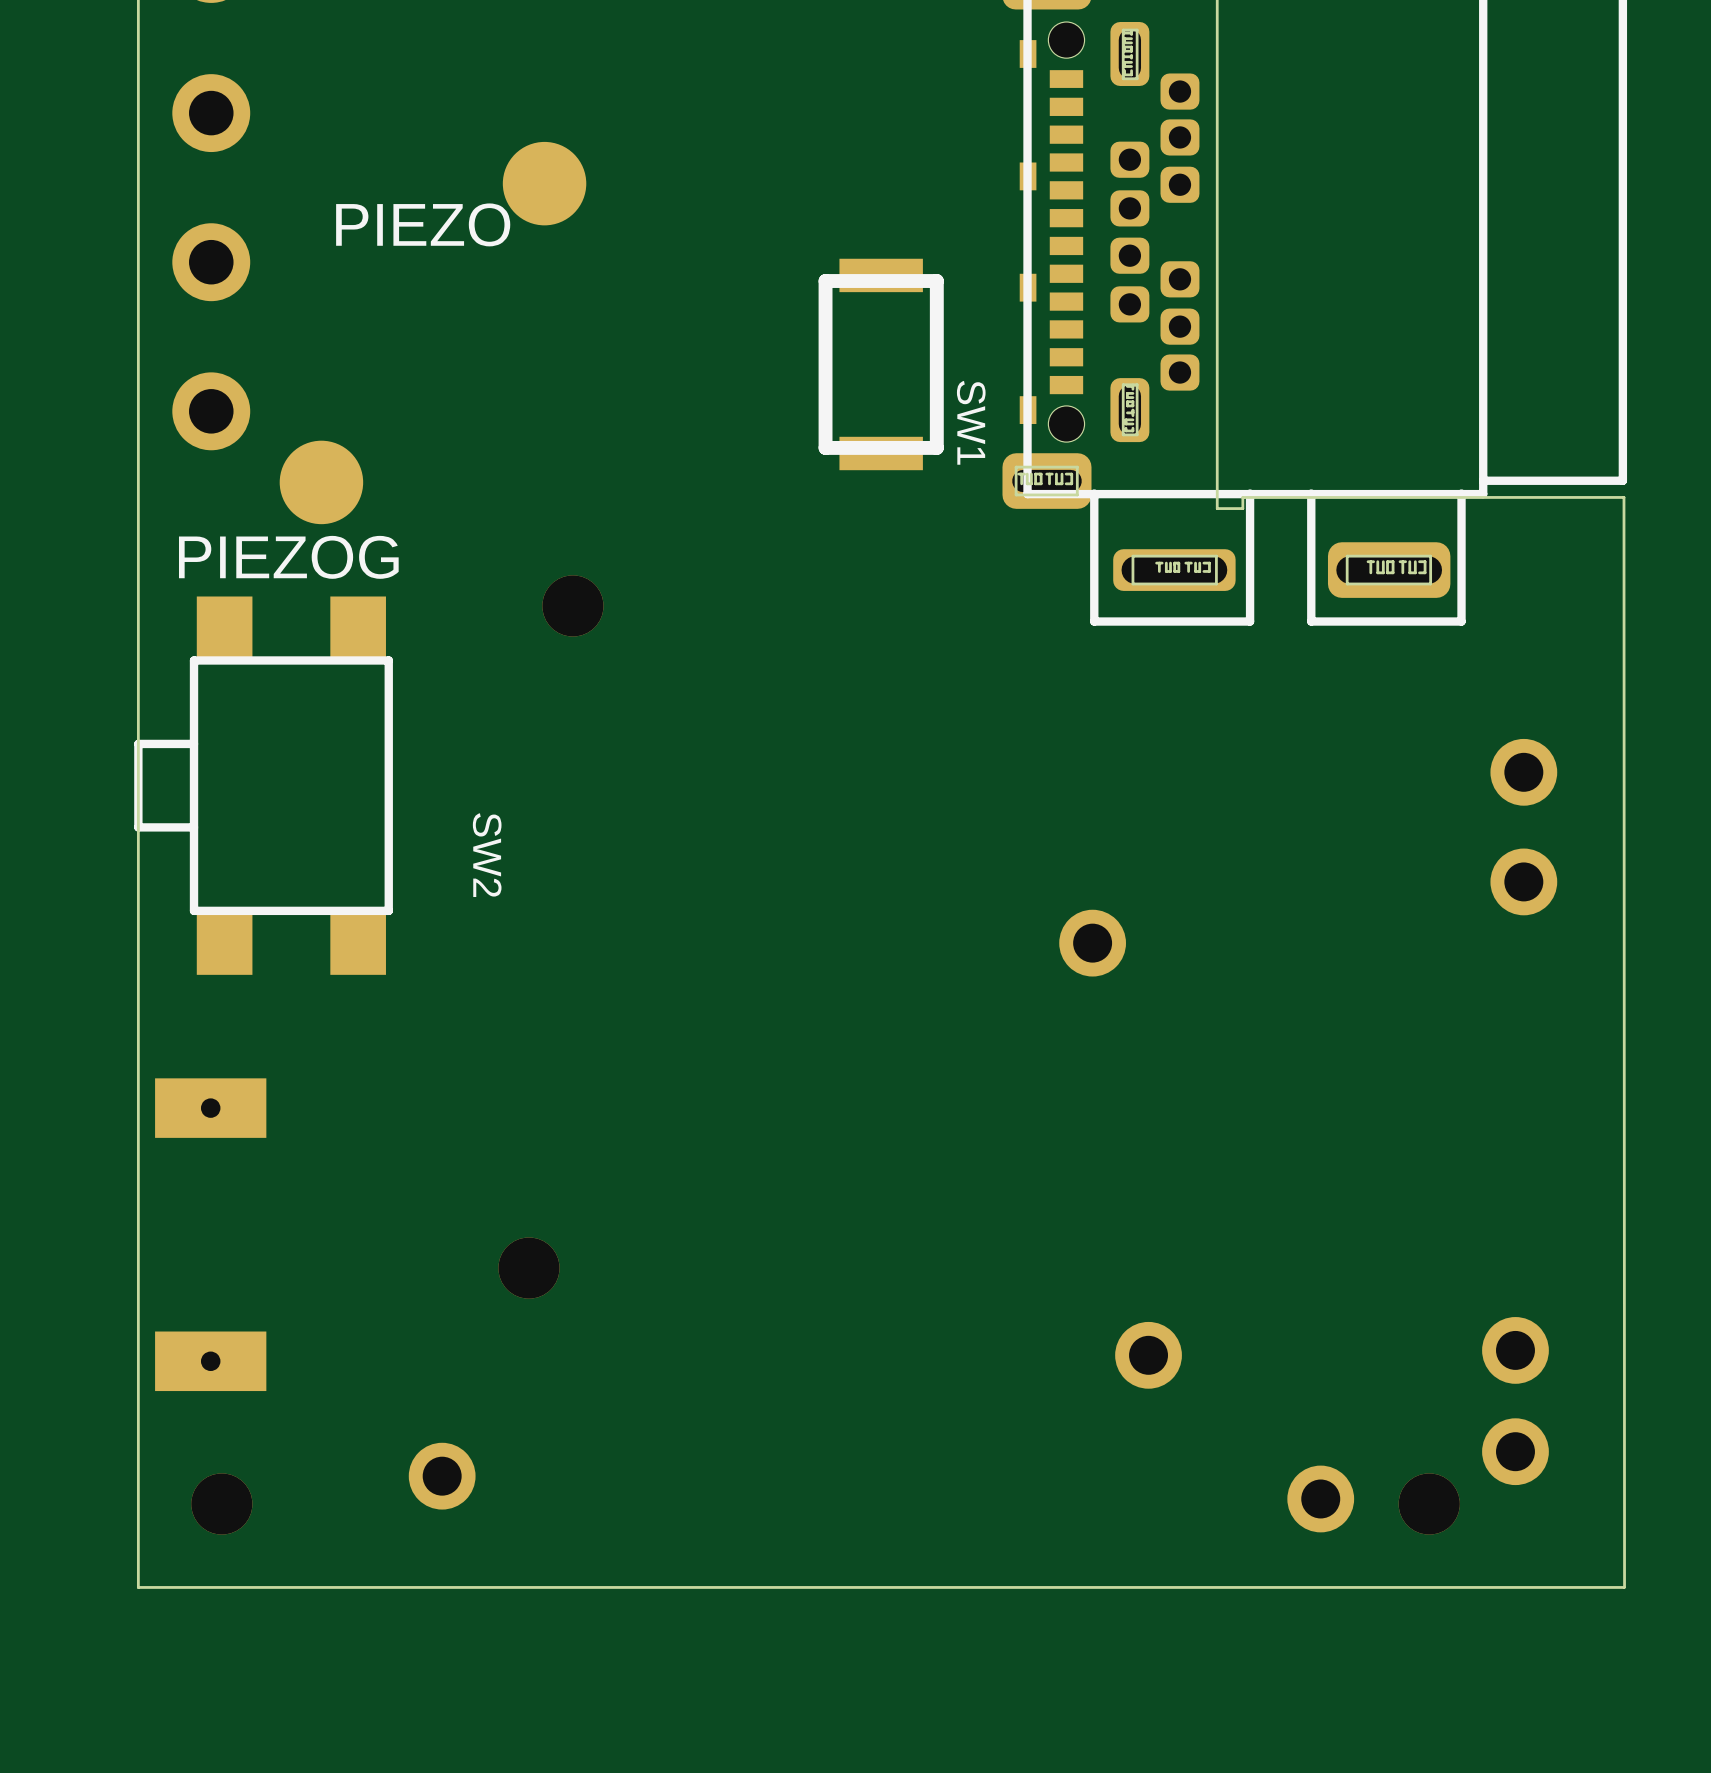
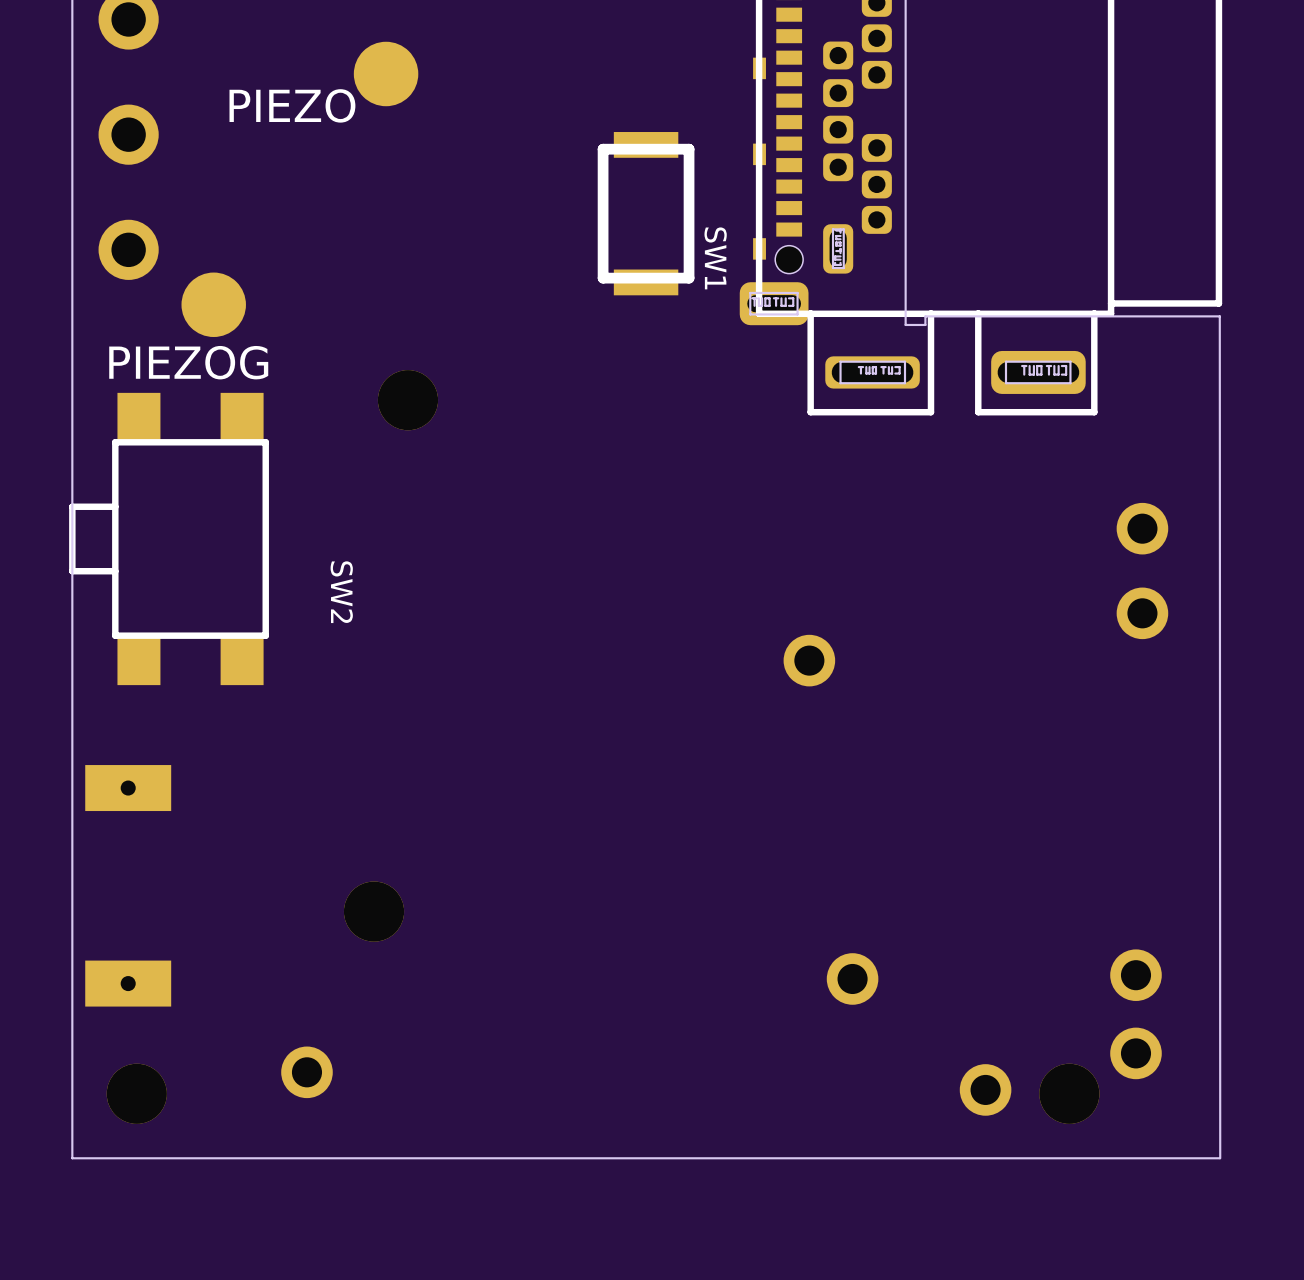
part footprint: [542, 575, 604, 637] -> [377, 370, 439, 431]
part footprint: [498, 1237, 560, 1299] -> [343, 881, 405, 942]
part footprint: [191, 1473, 253, 1535] -> [106, 1063, 167, 1124]
part footprint: [1398, 1473, 1460, 1535] -> [1039, 1063, 1100, 1124]

